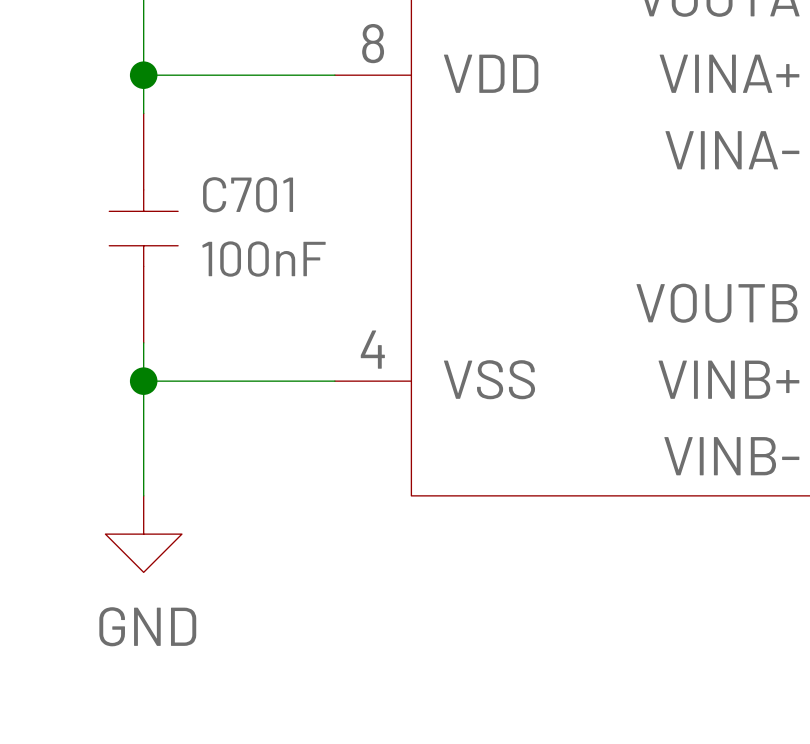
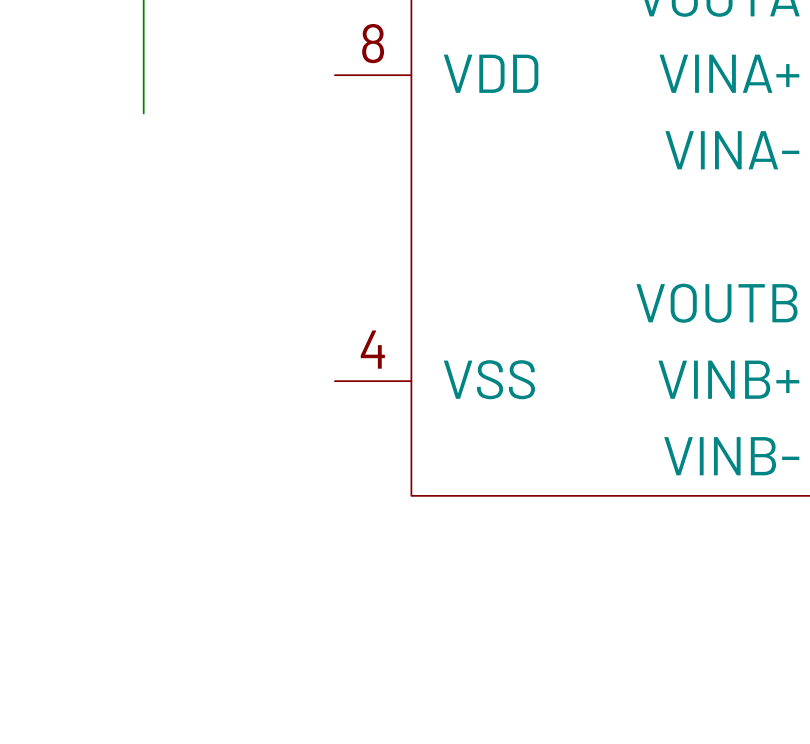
wire: (143, 75) (334, 75) -> none
junction: (143, 75) -> none
C701: 100nF (143, 228) -> none
wire: (143, 342) (143, 495) -> none
wire: (143, 381) (334, 381) -> none
junction: (143, 381) -> none
power symbol: GND (143, 534) -> none

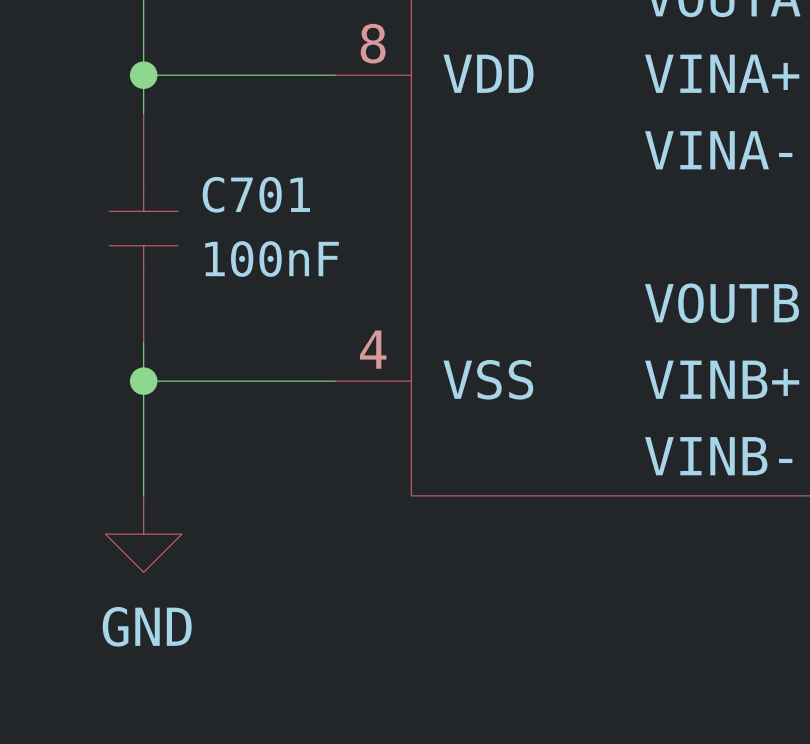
wire: none -> (143, 75) (334, 75)
junction: none -> (143, 75)
C701: none -> 100nF (143, 228)
wire: none -> (143, 342) (143, 495)
wire: none -> (143, 381) (334, 381)
junction: none -> (143, 381)
power symbol: none -> GND (143, 534)

